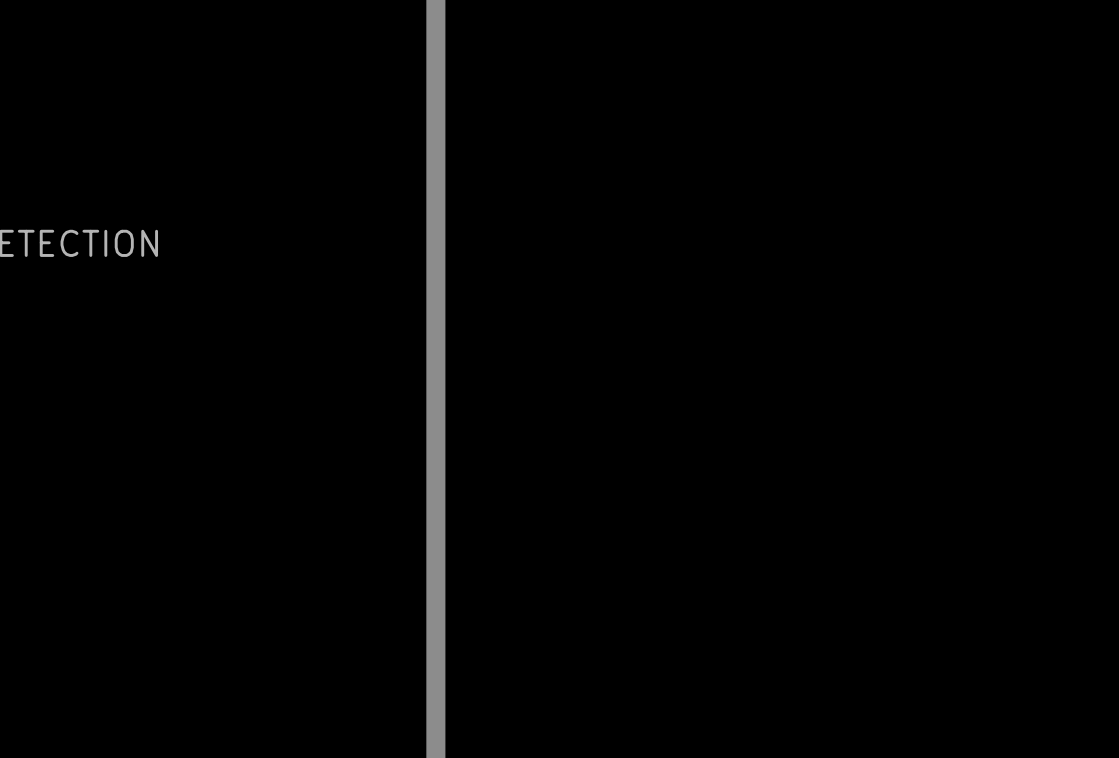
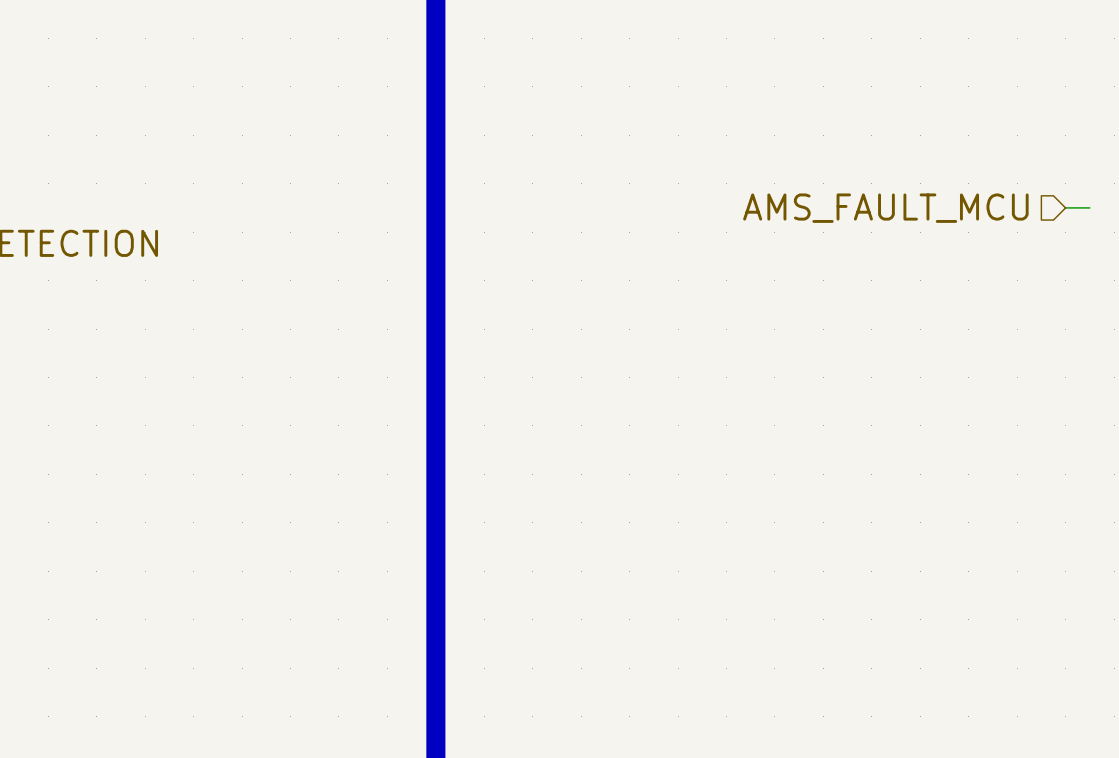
wire: none -> (1065, 207) (1089, 207)
hierarchical label: none -> AMS_FAULT_MCU (885, 208)

